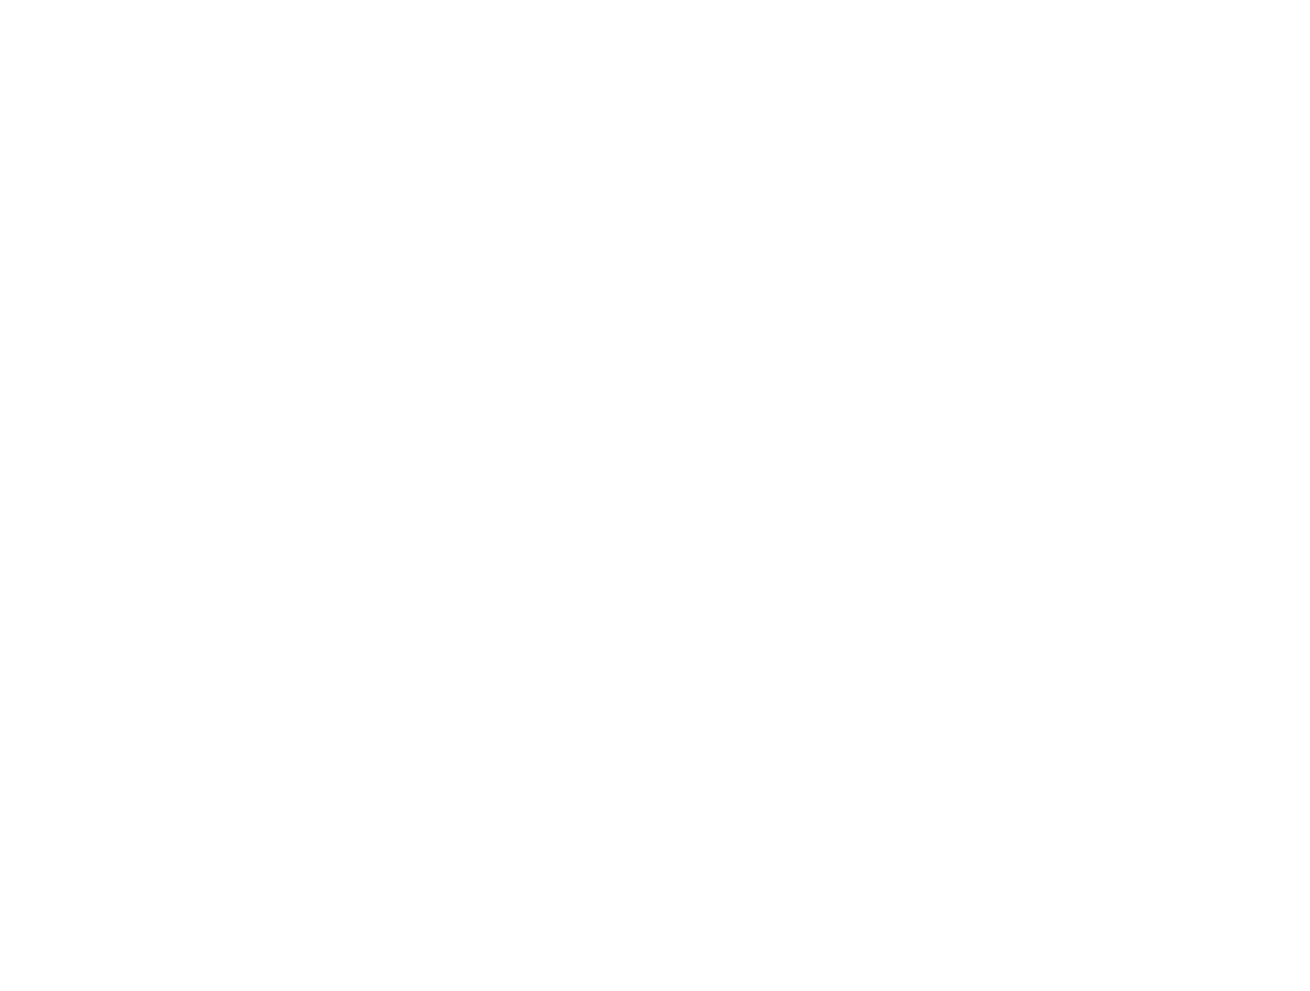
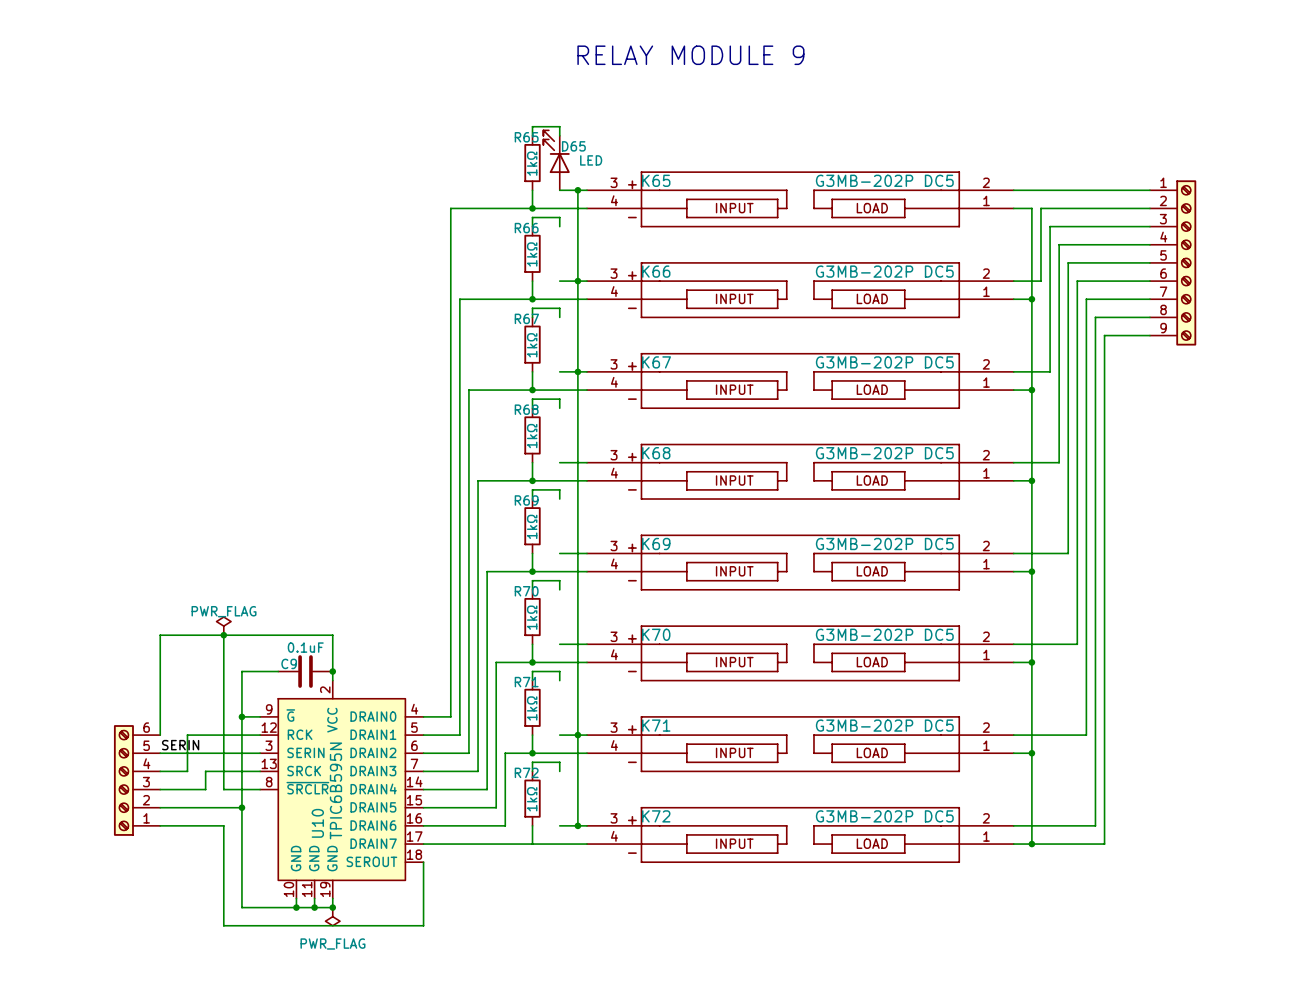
text: none -> RELAY MODULE 9 (690, 55)
wire: none -> (532, 135) (532, 126) (559, 126) (559, 135)
D65: none -> LED (556, 160)
R65: none -> 1kΩ (532, 163)
wire: none -> (532, 190) (532, 208)
wire: none -> (559, 190) (586, 190)
wire: none -> (577, 190) (577, 825)
junction: none -> (577, 190)
wire: none -> (1013, 190) (1149, 190)
K65: none -> G3MB-202P DC5 (800, 199)
junction: none -> (532, 208)
wire: none -> (586, 208) (450, 208) (450, 716) (423, 716)
wire: none -> (1013, 208) (1031, 208) (1031, 844)
wire: none -> (1149, 208) (1040, 208) (1040, 281) (1013, 281)
wire: none -> (532, 226) (532, 217) (559, 217) (559, 226)
wire: none -> (1149, 226) (1050, 226) (1050, 371) (1013, 371)
wire: none -> (1149, 244) (1059, 244) (1059, 462) (1013, 462)
R66: none -> 1kΩ (532, 253)
wire: none -> (1149, 262) (1068, 262) (1068, 553) (1013, 553)
part: none -> (1173, 262)
wire: none -> (532, 281) (532, 299)
wire: none -> (559, 281) (586, 281)
junction: none -> (577, 281)
wire: none -> (1149, 281) (1077, 281) (1077, 644) (1013, 644)
K66: none -> G3MB-202P DC5 (800, 290)
junction: none -> (532, 299)
wire: none -> (586, 299) (459, 299) (459, 735) (423, 735)
wire: none -> (1013, 299) (1031, 299)
junction: none -> (1031, 299)
wire: none -> (1149, 299) (1086, 299) (1086, 735) (1013, 735)
wire: none -> (532, 317) (532, 308) (559, 308) (559, 317)
wire: none -> (1149, 317) (1095, 317) (1095, 825) (1013, 825)
wire: none -> (1149, 335) (1104, 335) (1104, 844) (1013, 844)
R67: none -> 1kΩ (532, 344)
wire: none -> (532, 371) (532, 390)
wire: none -> (559, 371) (586, 371)
junction: none -> (577, 371)
K67: none -> G3MB-202P DC5 (800, 380)
junction: none -> (532, 390)
wire: none -> (586, 390) (468, 390) (468, 753) (423, 753)
wire: none -> (1013, 390) (1031, 390)
junction: none -> (1031, 390)
wire: none -> (532, 408) (532, 399) (559, 399) (559, 408)
R68: none -> 1kΩ (532, 435)
wire: none -> (532, 462) (532, 480)
wire: none -> (559, 462) (586, 462)
K68: none -> G3MB-202P DC5 (800, 471)
junction: none -> (532, 480)
wire: none -> (586, 480) (478, 480) (478, 771) (423, 771)
wire: none -> (1013, 480) (1031, 480)
junction: none -> (1031, 480)
wire: none -> (532, 499) (532, 489) (559, 489) (559, 499)
R69: none -> 1kΩ (532, 526)
wire: none -> (532, 553) (532, 571)
wire: none -> (559, 553) (586, 553)
K69: none -> G3MB-202P DC5 (800, 562)
junction: none -> (532, 571)
wire: none -> (586, 571) (487, 571) (487, 789) (423, 789)
wire: none -> (1013, 571) (1031, 571)
junction: none -> (1031, 571)
wire: none -> (532, 589) (532, 580) (559, 580) (559, 589)
R70: none -> 1kΩ (532, 617)
power symbol: none -> PWR_FLAG (223, 626)
wire: none -> (223, 635) (223, 789) (260, 789)
junction: none -> (223, 635)
wire: none -> (532, 644) (532, 662)
wire: none -> (559, 644) (586, 644)
K70: none -> G3MB-202P DC5 (800, 653)
junction: none -> (532, 662)
wire: none -> (586, 662) (496, 662) (496, 807) (423, 807)
wire: none -> (1013, 662) (1031, 662)
junction: none -> (1031, 662)
wire: none -> (278, 671) (241, 671) (241, 907) (332, 907) (332, 898)
C9: none -> 0.1uF (305, 671)
junction: none -> (332, 671)
wire: none -> (332, 680) (332, 635) (160, 635) (160, 735)
wire: none -> (532, 680) (532, 671) (559, 671) (559, 680)
R71: none -> 1kΩ (532, 707)
wire: none -> (241, 716) (260, 716)
junction: none -> (241, 716)
wire: none -> (260, 735) (187, 735) (187, 771) (160, 771)
wire: none -> (532, 735) (532, 753)
wire: none -> (559, 735) (586, 735)
junction: none -> (577, 735)
K71: none -> G3MB-202P DC5 (800, 744)
label: none -> SERIN (180, 745)
wire: none -> (160, 753) (260, 753)
junction: none -> (532, 753)
wire: none -> (586, 753) (505, 753) (505, 825) (423, 825)
wire: none -> (1013, 753) (1031, 753)
junction: none -> (1031, 753)
wire: none -> (260, 771) (205, 771) (205, 789) (160, 789)
wire: none -> (532, 771) (532, 762) (559, 762) (559, 771)
part: none -> (137, 780)
U10: none -> TPIC6B595N (341, 789)
R72: none -> 1kΩ (532, 798)
wire: none -> (160, 807) (241, 807)
junction: none -> (241, 807)
wire: none -> (160, 825) (223, 825) (223, 925) (423, 925) (423, 862)
wire: none -> (532, 825) (532, 844)
wire: none -> (559, 825) (586, 825)
junction: none -> (577, 825)
K72: none -> G3MB-202P DC5 (800, 834)
wire: none -> (423, 844) (586, 844)
junction: none -> (1031, 844)
wire: none -> (296, 898) (296, 907)
wire: none -> (314, 898) (314, 907)
junction: none -> (296, 907)
junction: none -> (314, 907)
junction: none -> (332, 907)
power symbol: none -> PWR_FLAG (332, 916)

